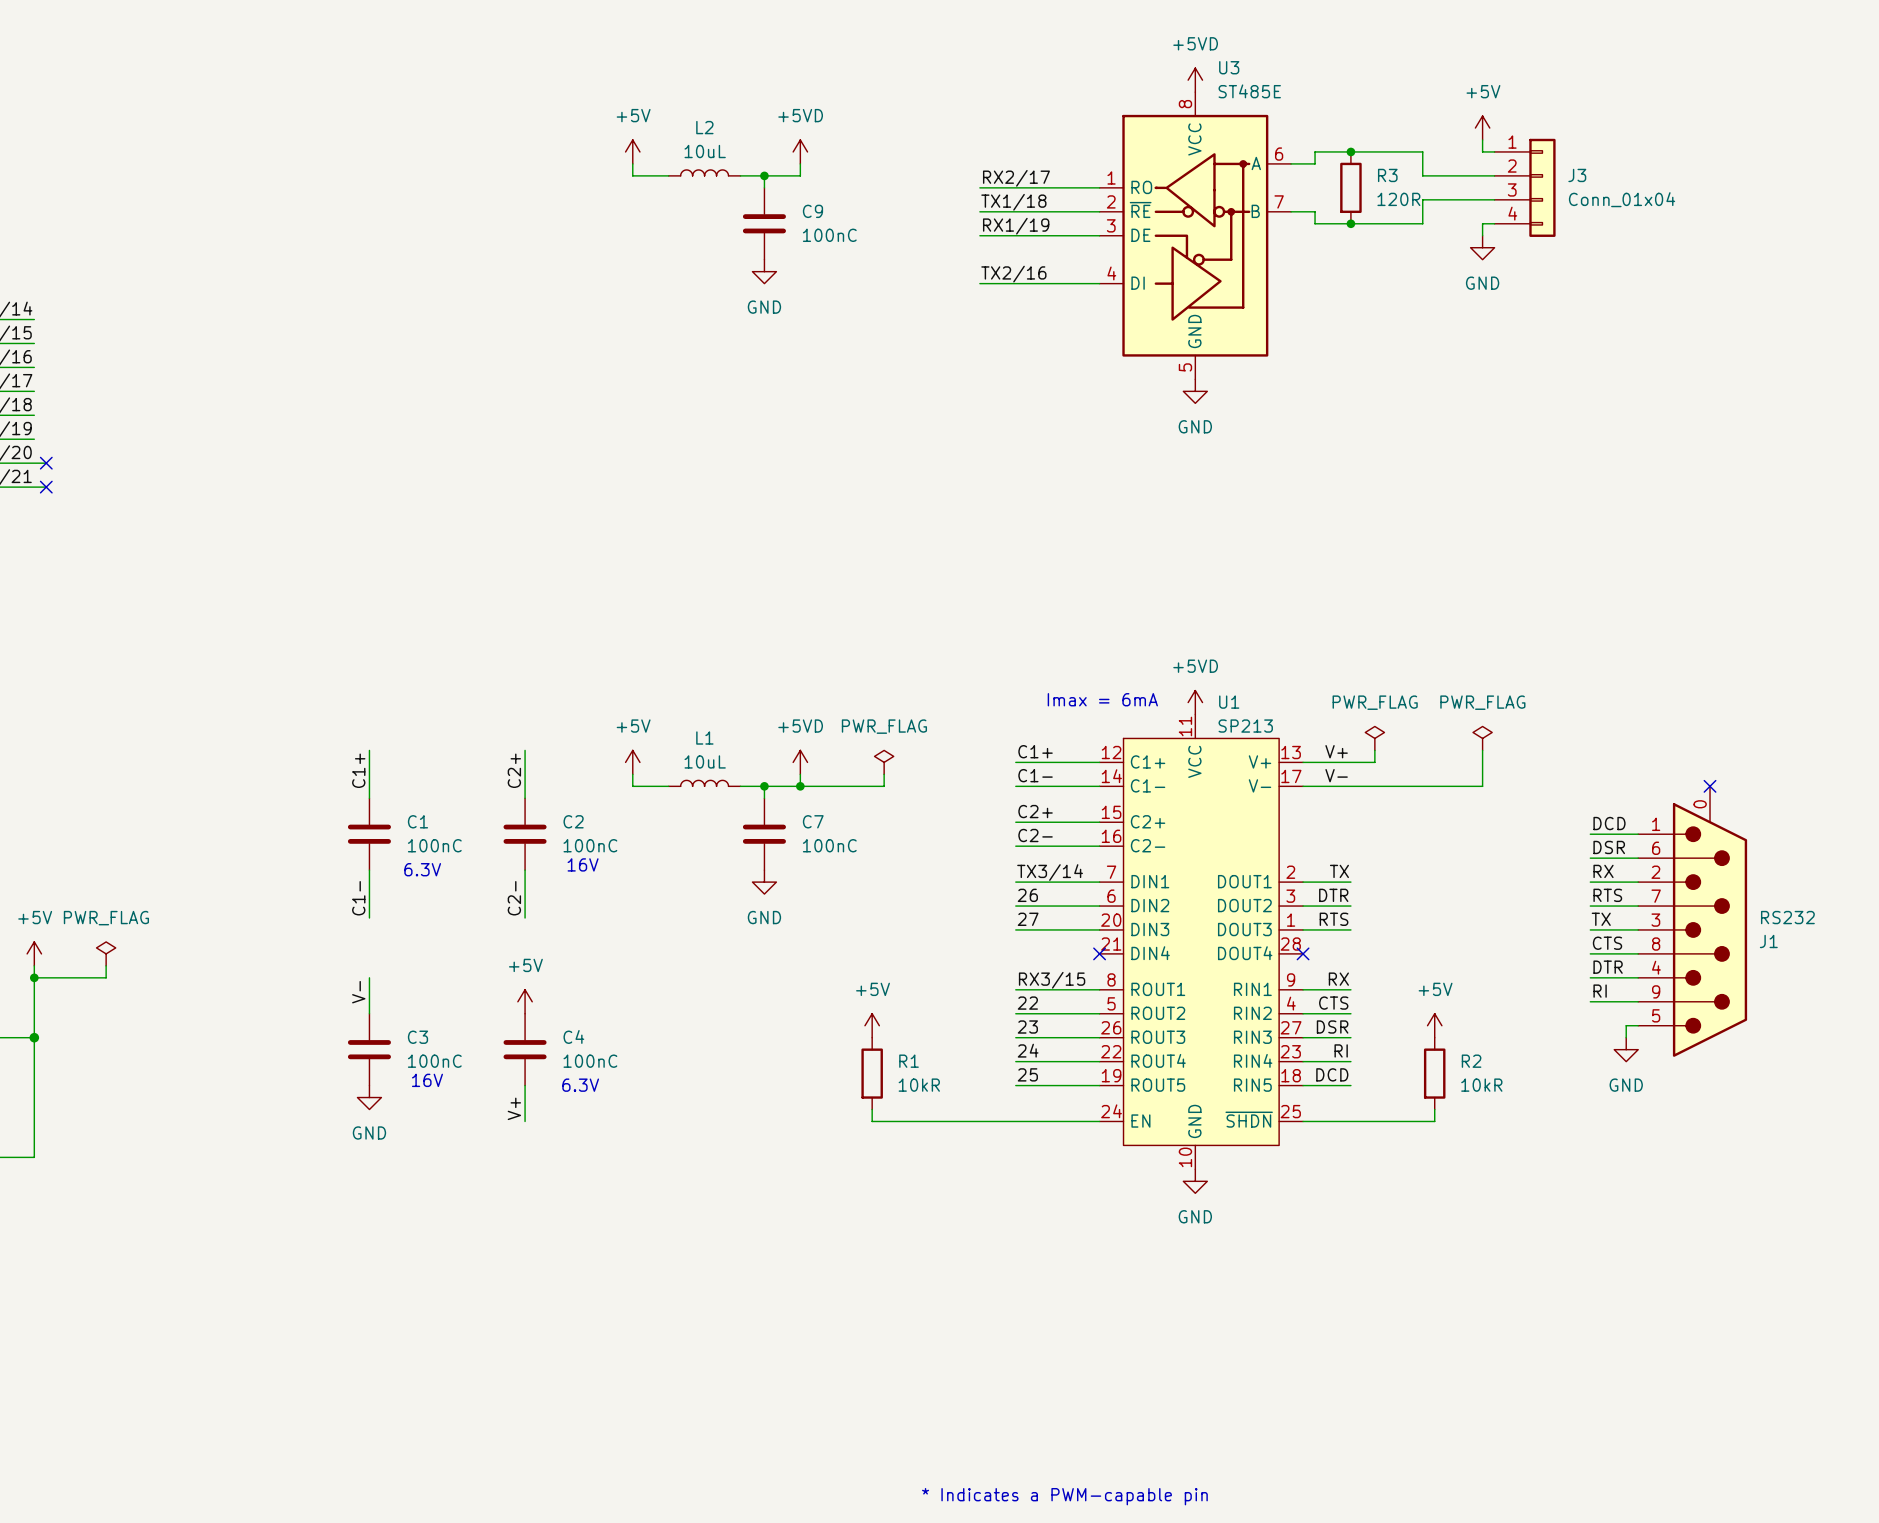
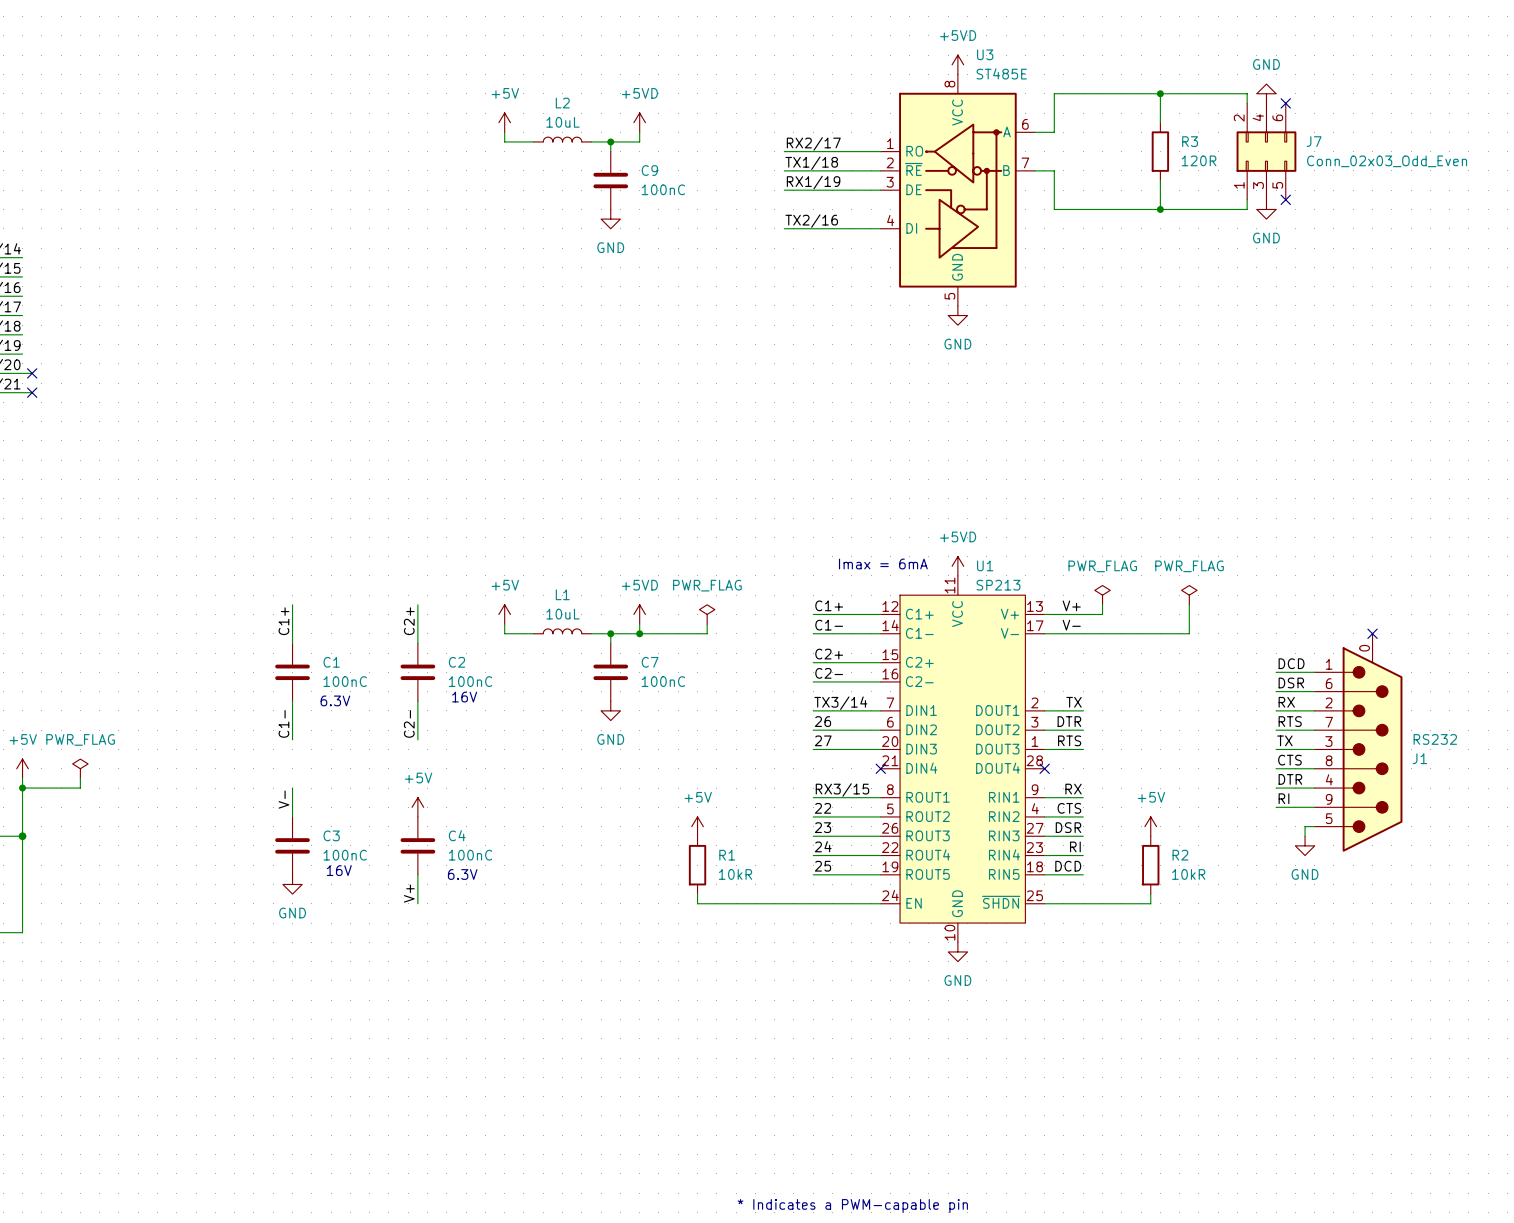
wire: none -> (1160, 93) (1160, 122)
junction: none -> (1160, 93)
power symbol: none -> GND (1266, 93)
power symbol: +5V (1482, 128) -> none
no-connect mark: none -> (1285, 103)
wire: (1482, 139) (1482, 151) (1494, 151) -> none
wire: (1315, 151) (1422, 151) (1422, 175) (1494, 175) -> (1054, 122) (1054, 93) (1247, 93) (1247, 103)
junction: (1350, 151) -> none
R3 position: (1350, 187) -> (1160, 151)
J3: Conn_01x04 (1525, 187) -> none
J7: none -> Conn_02x03_Odd_Even (1266, 151)
wire: (1494, 199) (1422, 199) (1422, 223) (1315, 223) -> (1247, 199) (1247, 209) (1054, 209) (1054, 180)
junction: (1350, 223) -> none
wire: none -> (1160, 180) (1160, 209)
wire: (1494, 223) (1482, 223) (1482, 235) -> none
power symbol: GND (1482, 247) -> none
no-connect mark: none -> (1285, 199)
junction: none -> (1160, 209)
power symbol: none -> GND (1266, 209)

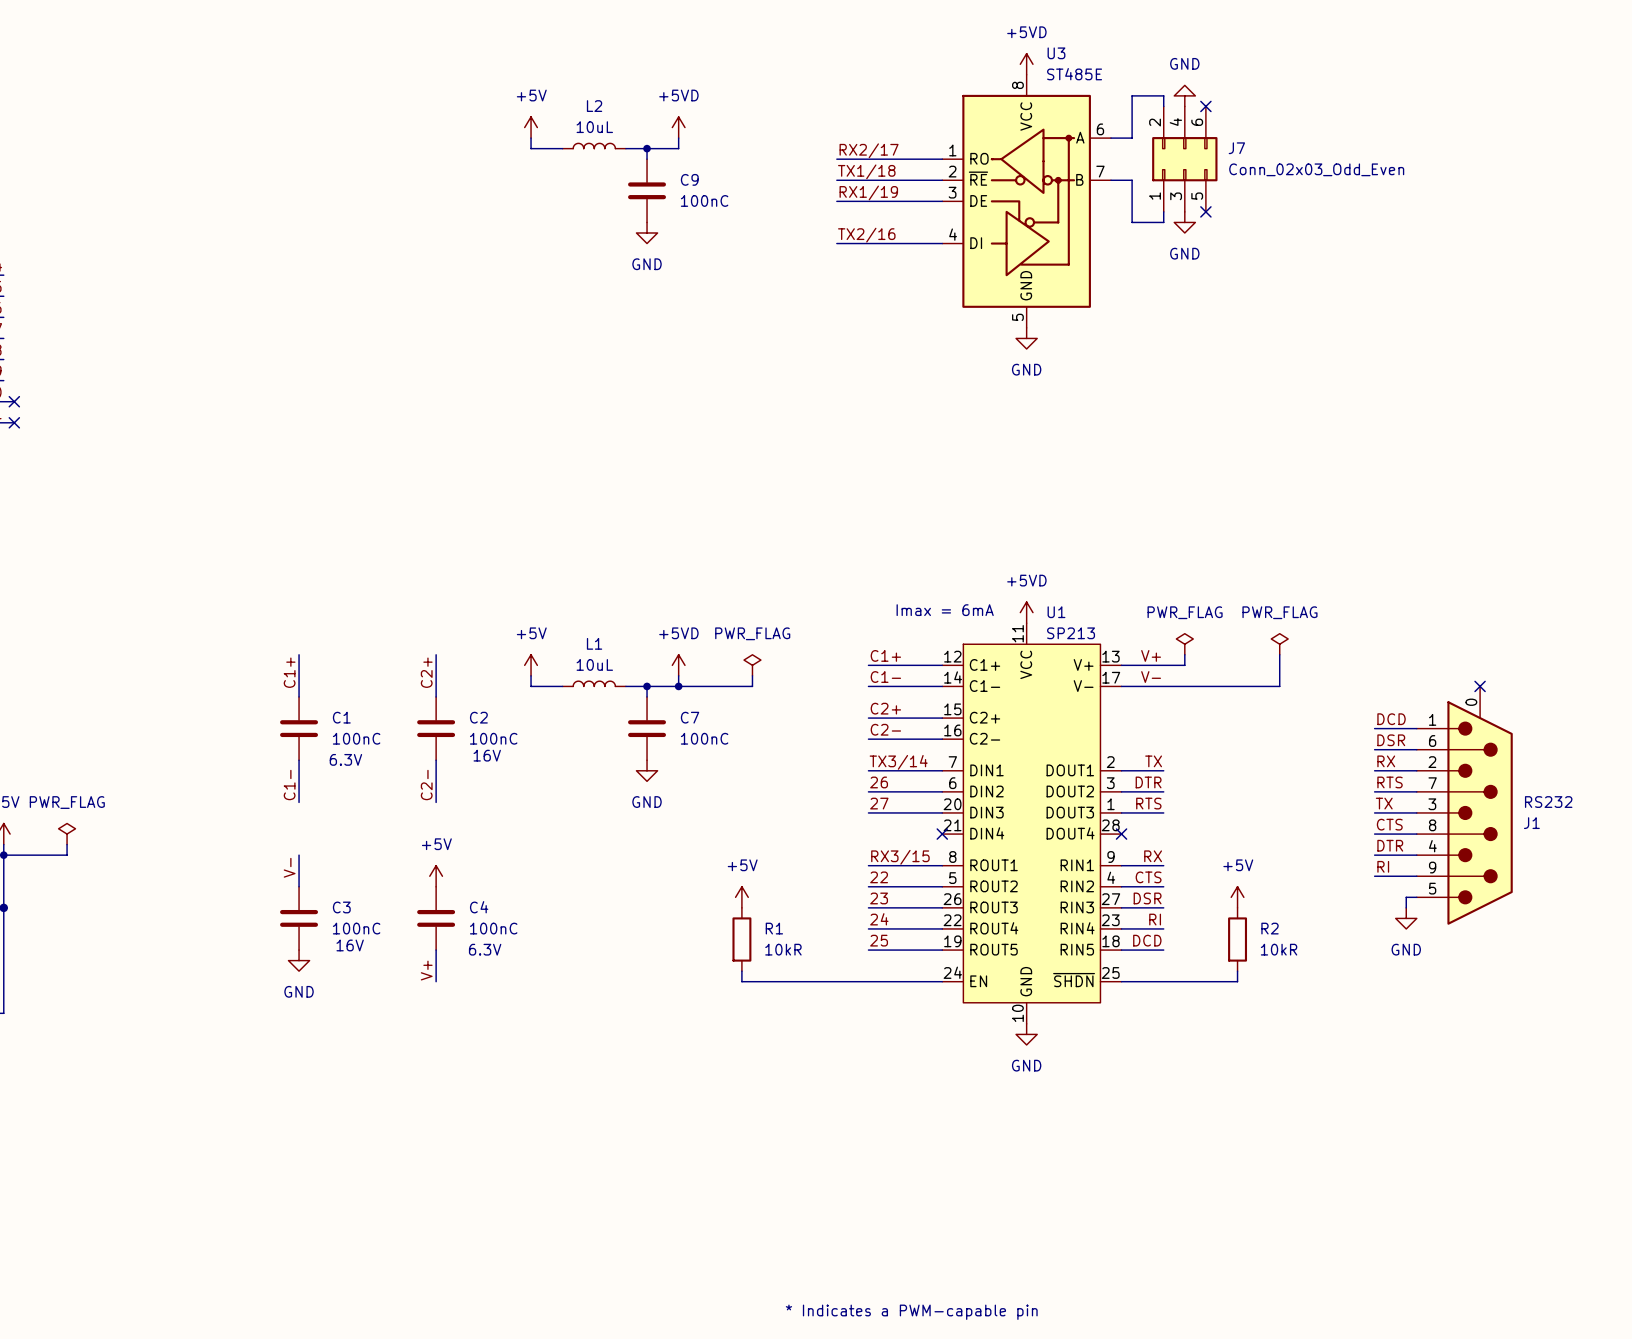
wire: (1083, 93) (1247, 93) (1247, 103) -> (1163, 95) (1163, 106)
power symbol: none -> GND (1184, 95)
wire: (1160, 93) (1160, 122) -> none
junction: (1160, 93) -> none
power symbol: GND (1266, 93) -> none
no-connect mark: none -> (1205, 106)
no-connect mark: (1285, 103) -> none
R3: 120R (1160, 151) -> none
J7 position: (1266, 151) -> (1184, 159)
wire: (1160, 180) (1160, 209) -> none
no-connect mark: none -> (1205, 211)
wire: (1247, 199) (1247, 209) (1083, 209) -> (1163, 211) (1163, 222)
no-connect mark: (1285, 199) -> none
power symbol: none -> GND (1184, 222)
junction: (1160, 209) -> none
power symbol: GND (1266, 209) -> none

